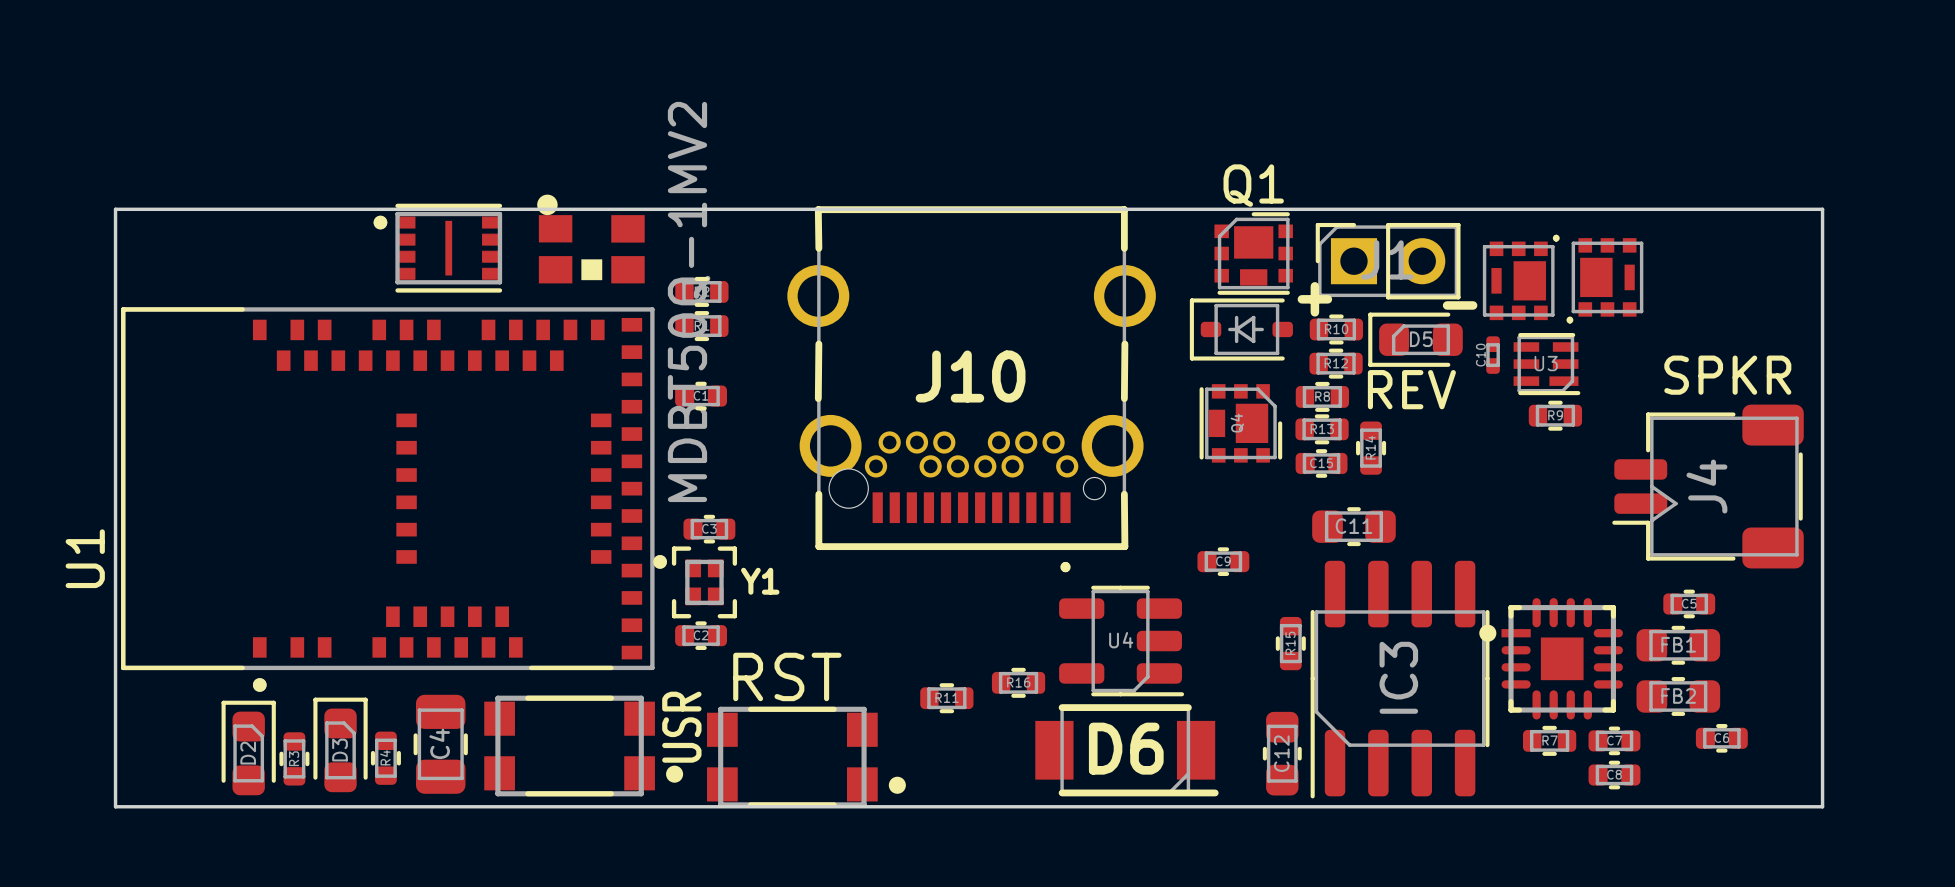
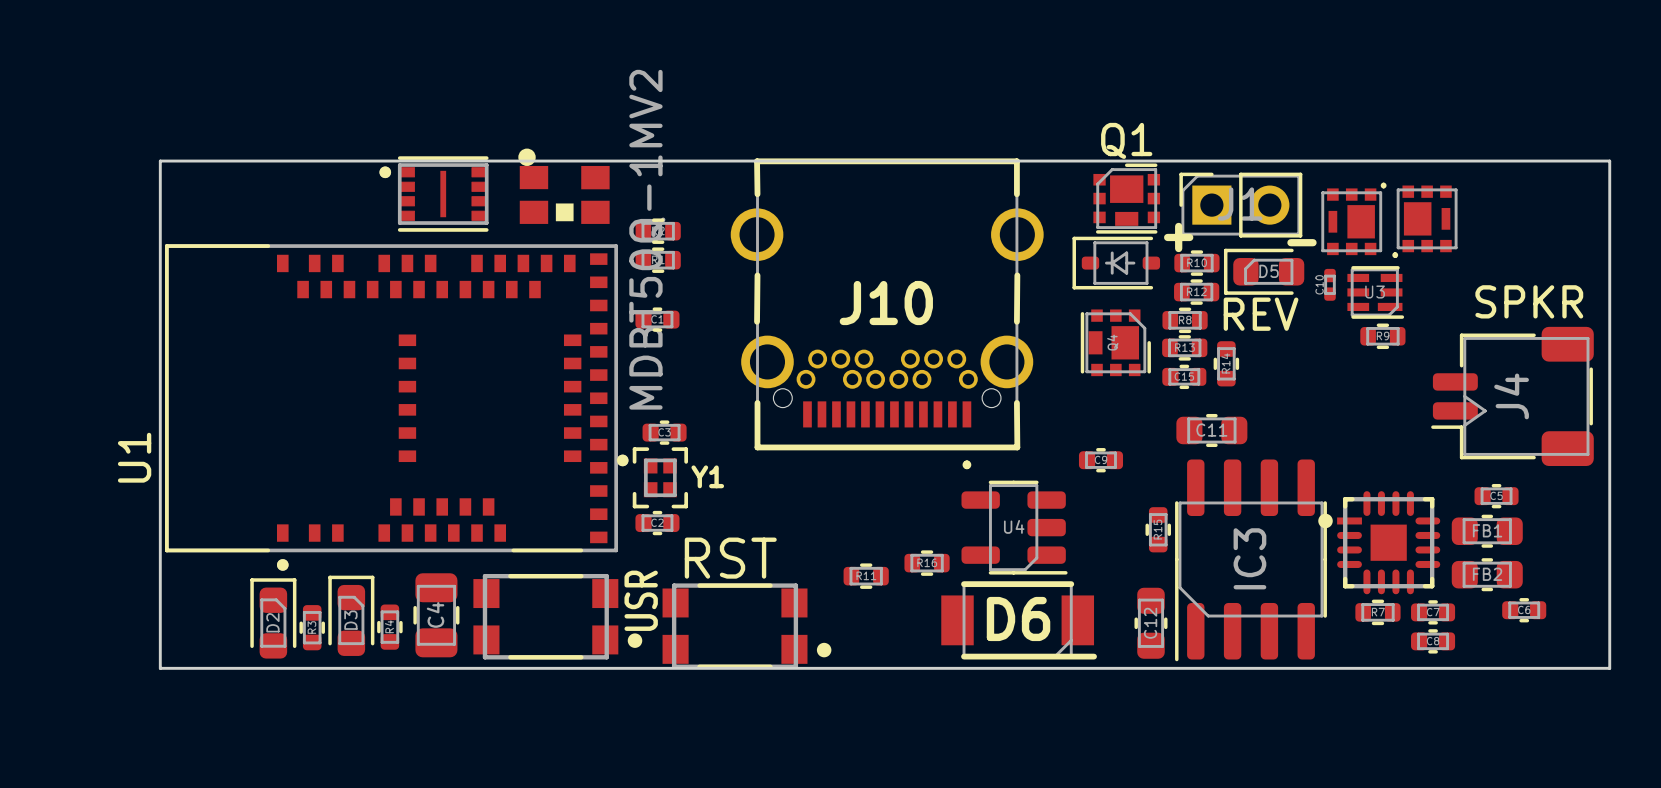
J10 footprint: [787, 206, 1156, 573] -> [730, 158, 1044, 470]

